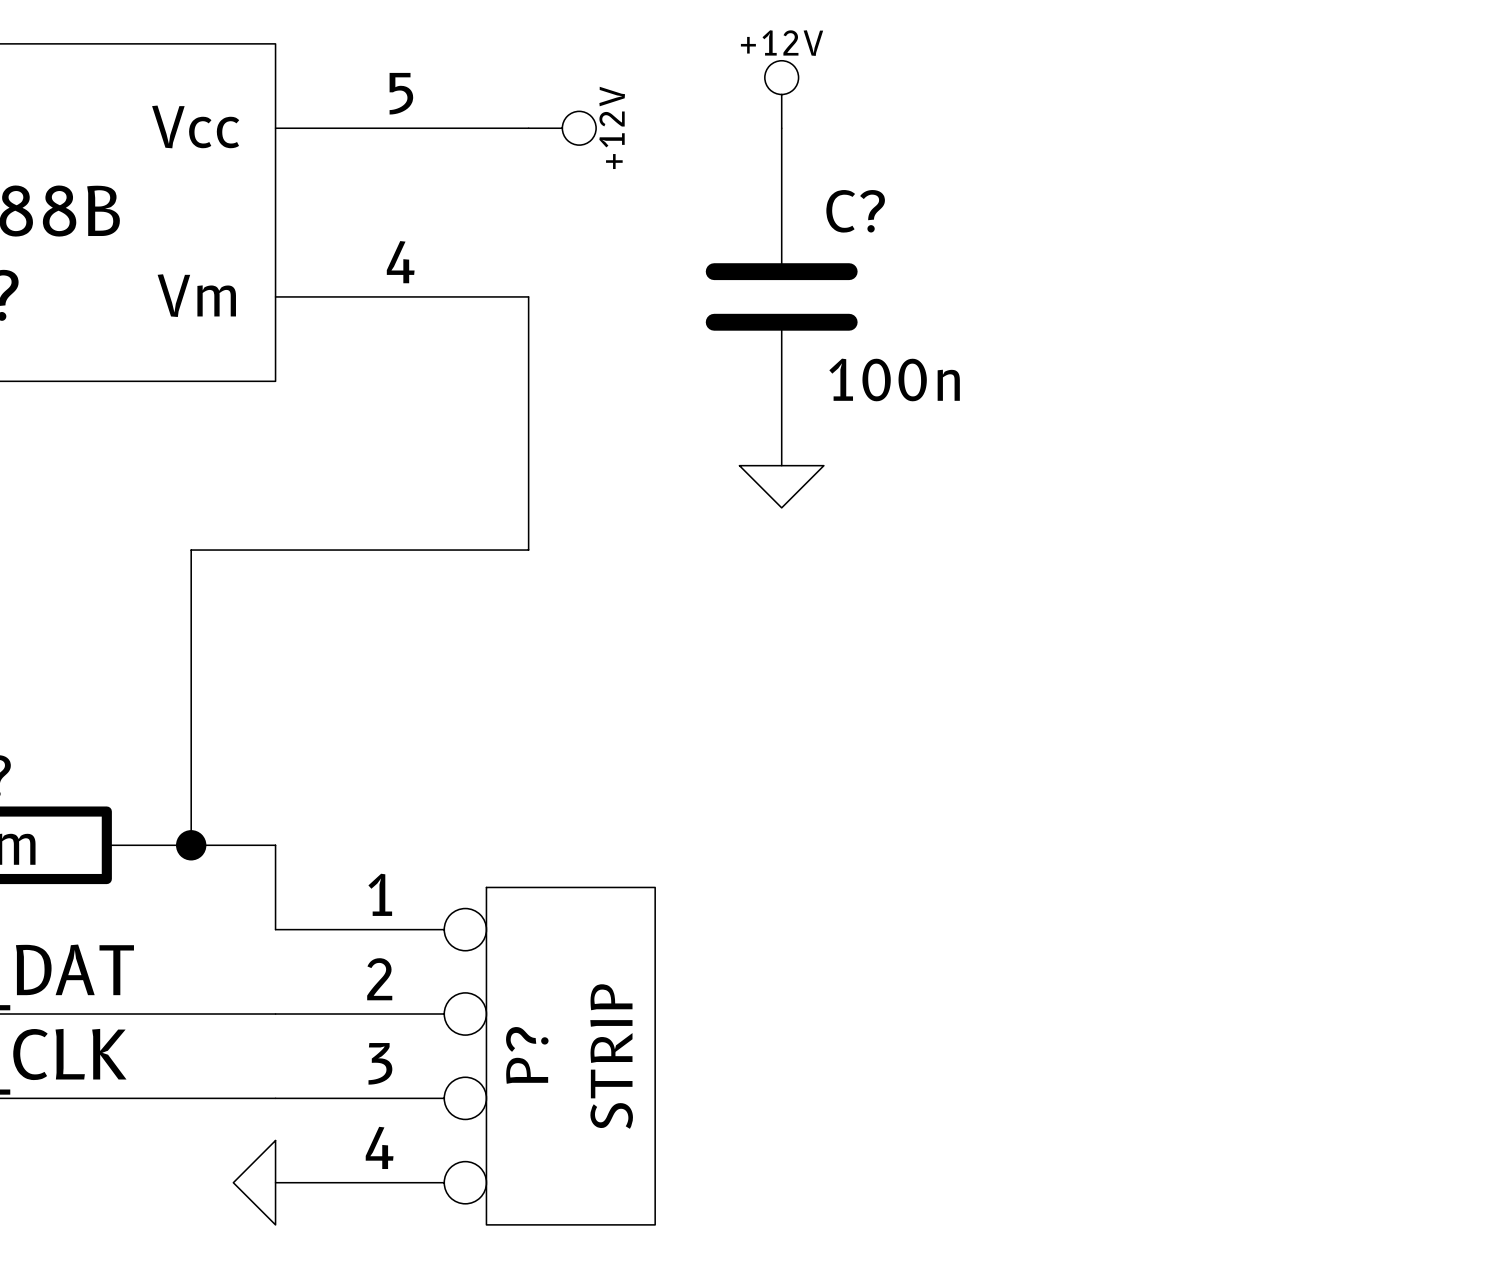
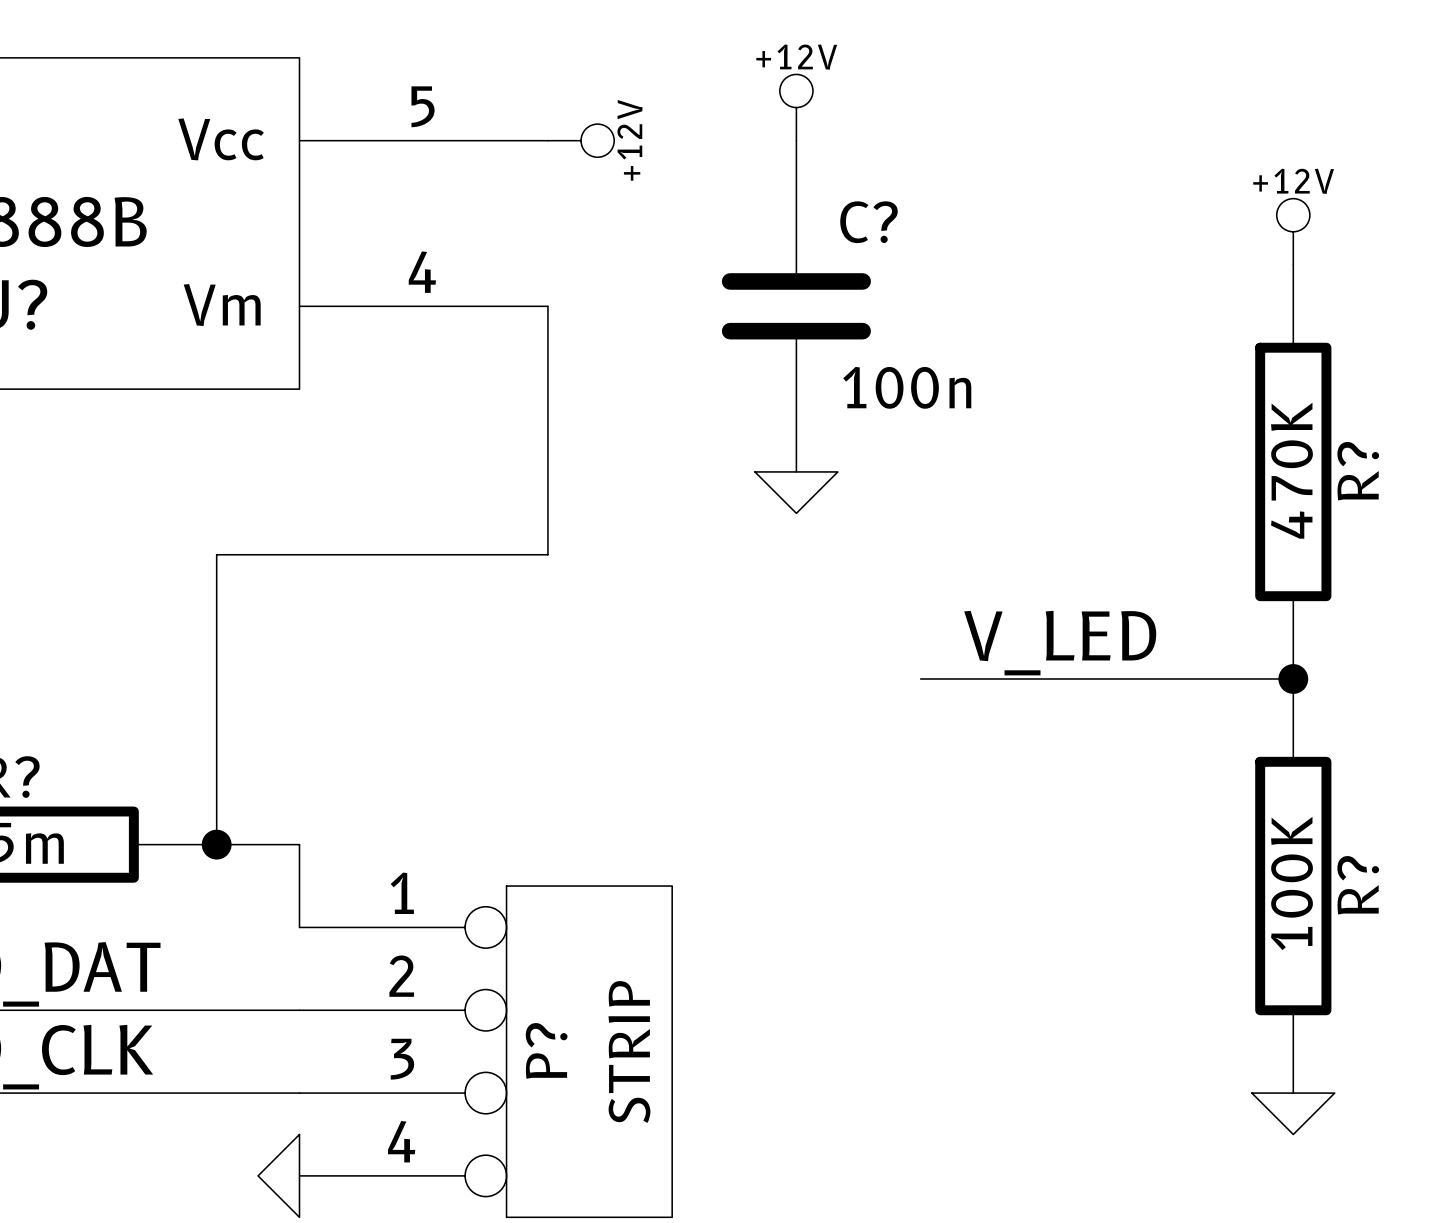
power symbol: none -> +12V (1293, 231)
R?: none -> 470K (1293, 471)
label: none -> V_LED (1060, 643)
wire: none -> (920, 678) (1293, 678)
junction: none -> (1293, 678)
R?: none -> 100K (1293, 886)
power symbol: none -> (1293, 1113)

